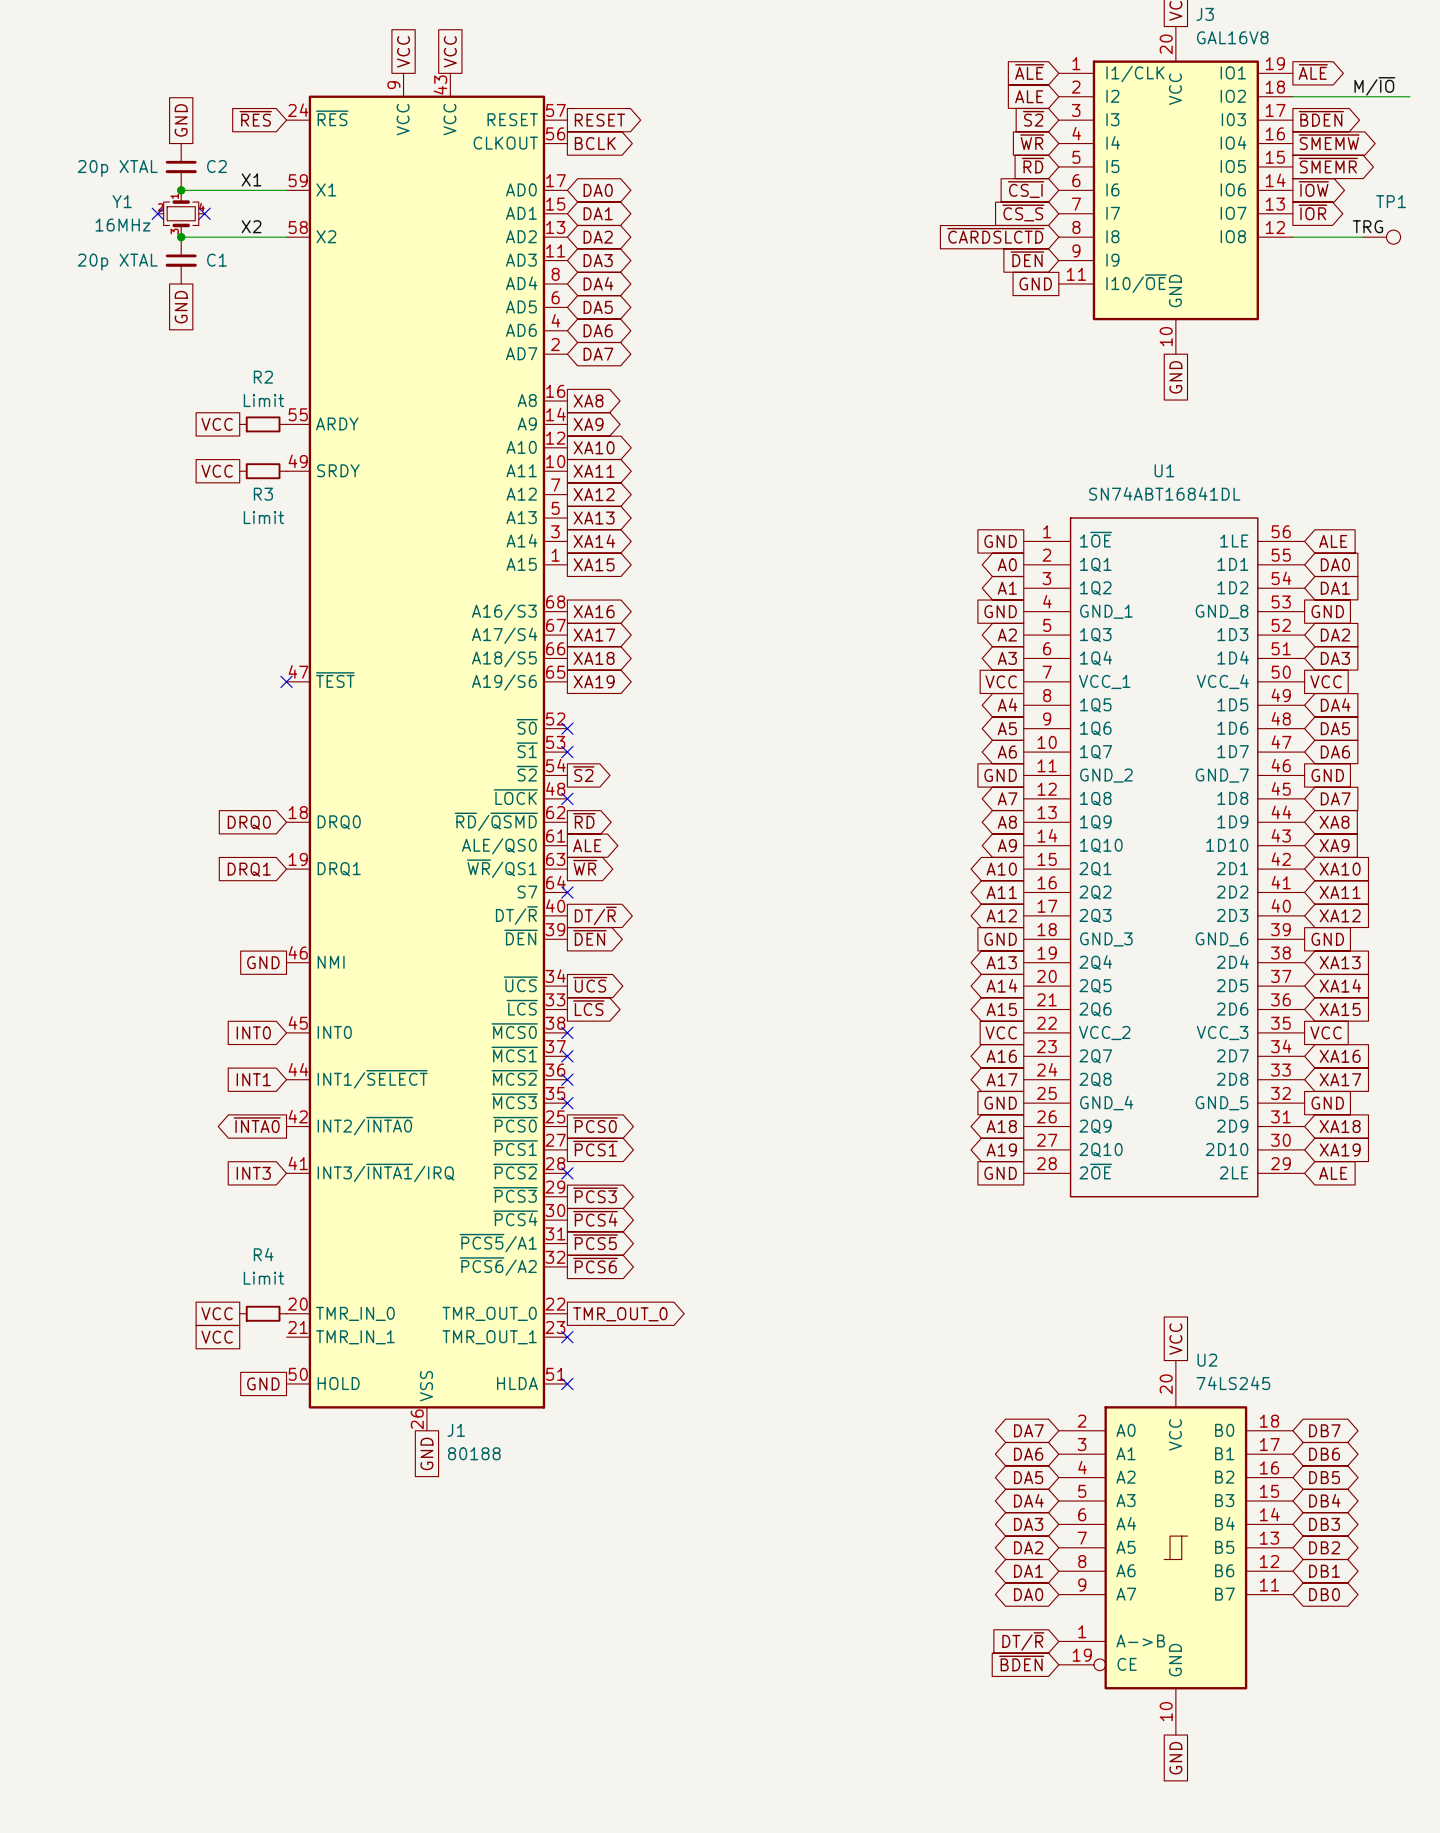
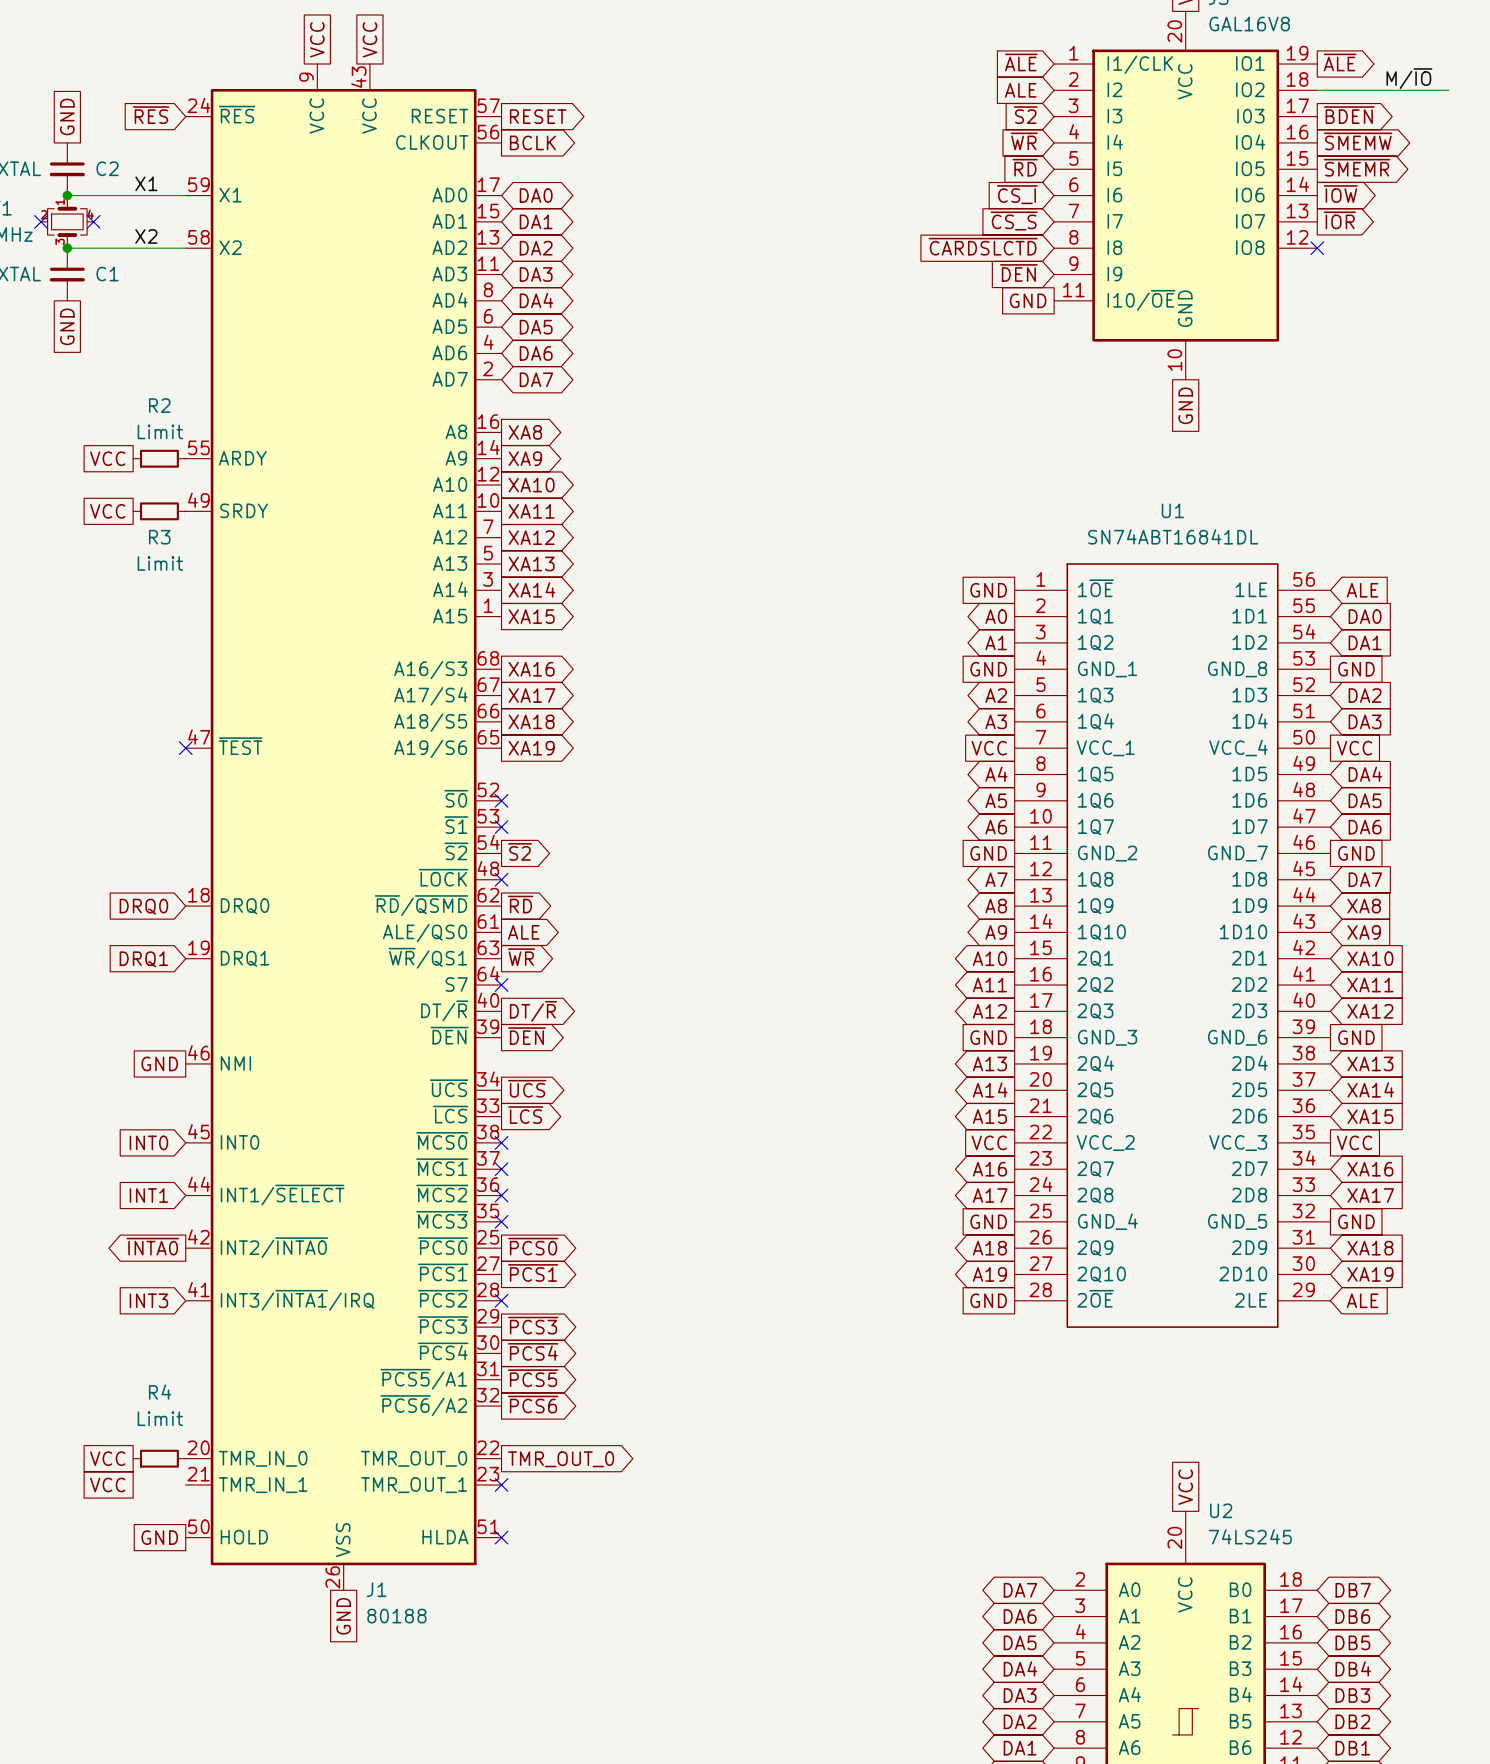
label: TRG (1367, 226) -> none
wire: (1292, 237) (1363, 237) -> none
no-connect mark: none -> (1317, 248)
TP1: (1381, 237) -> none

